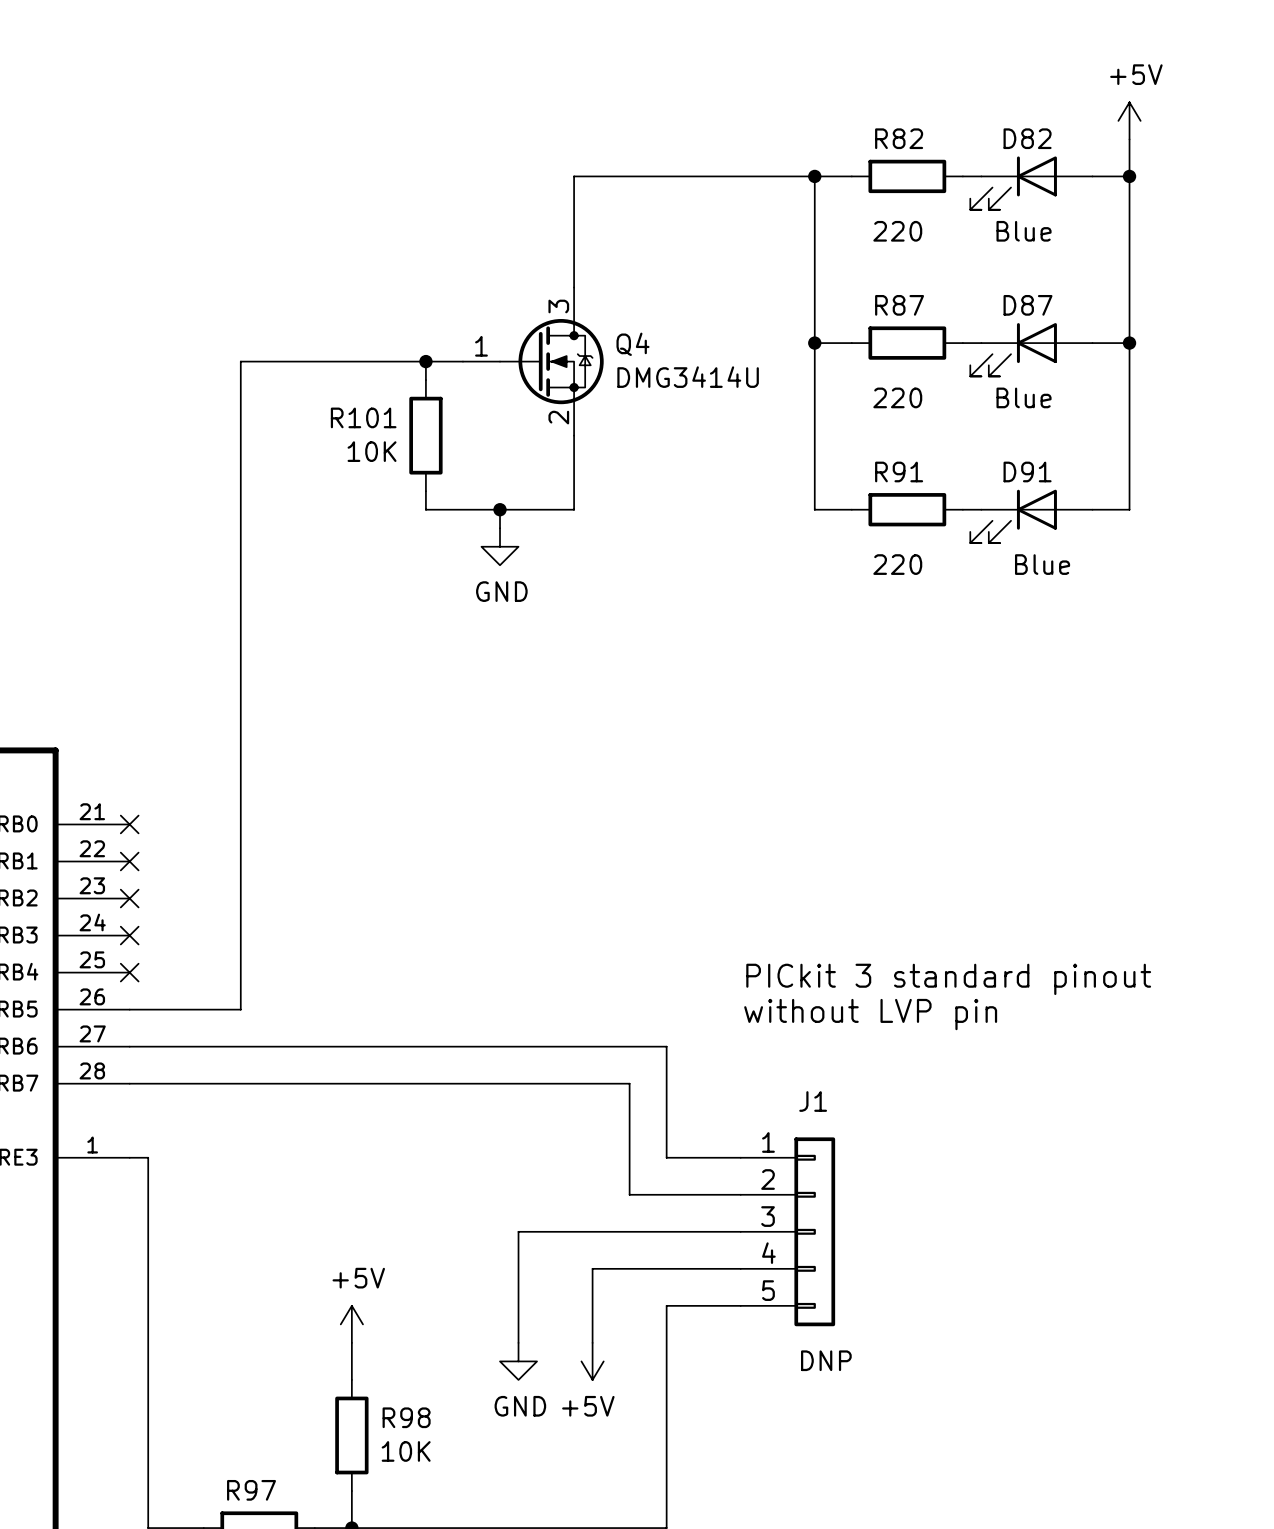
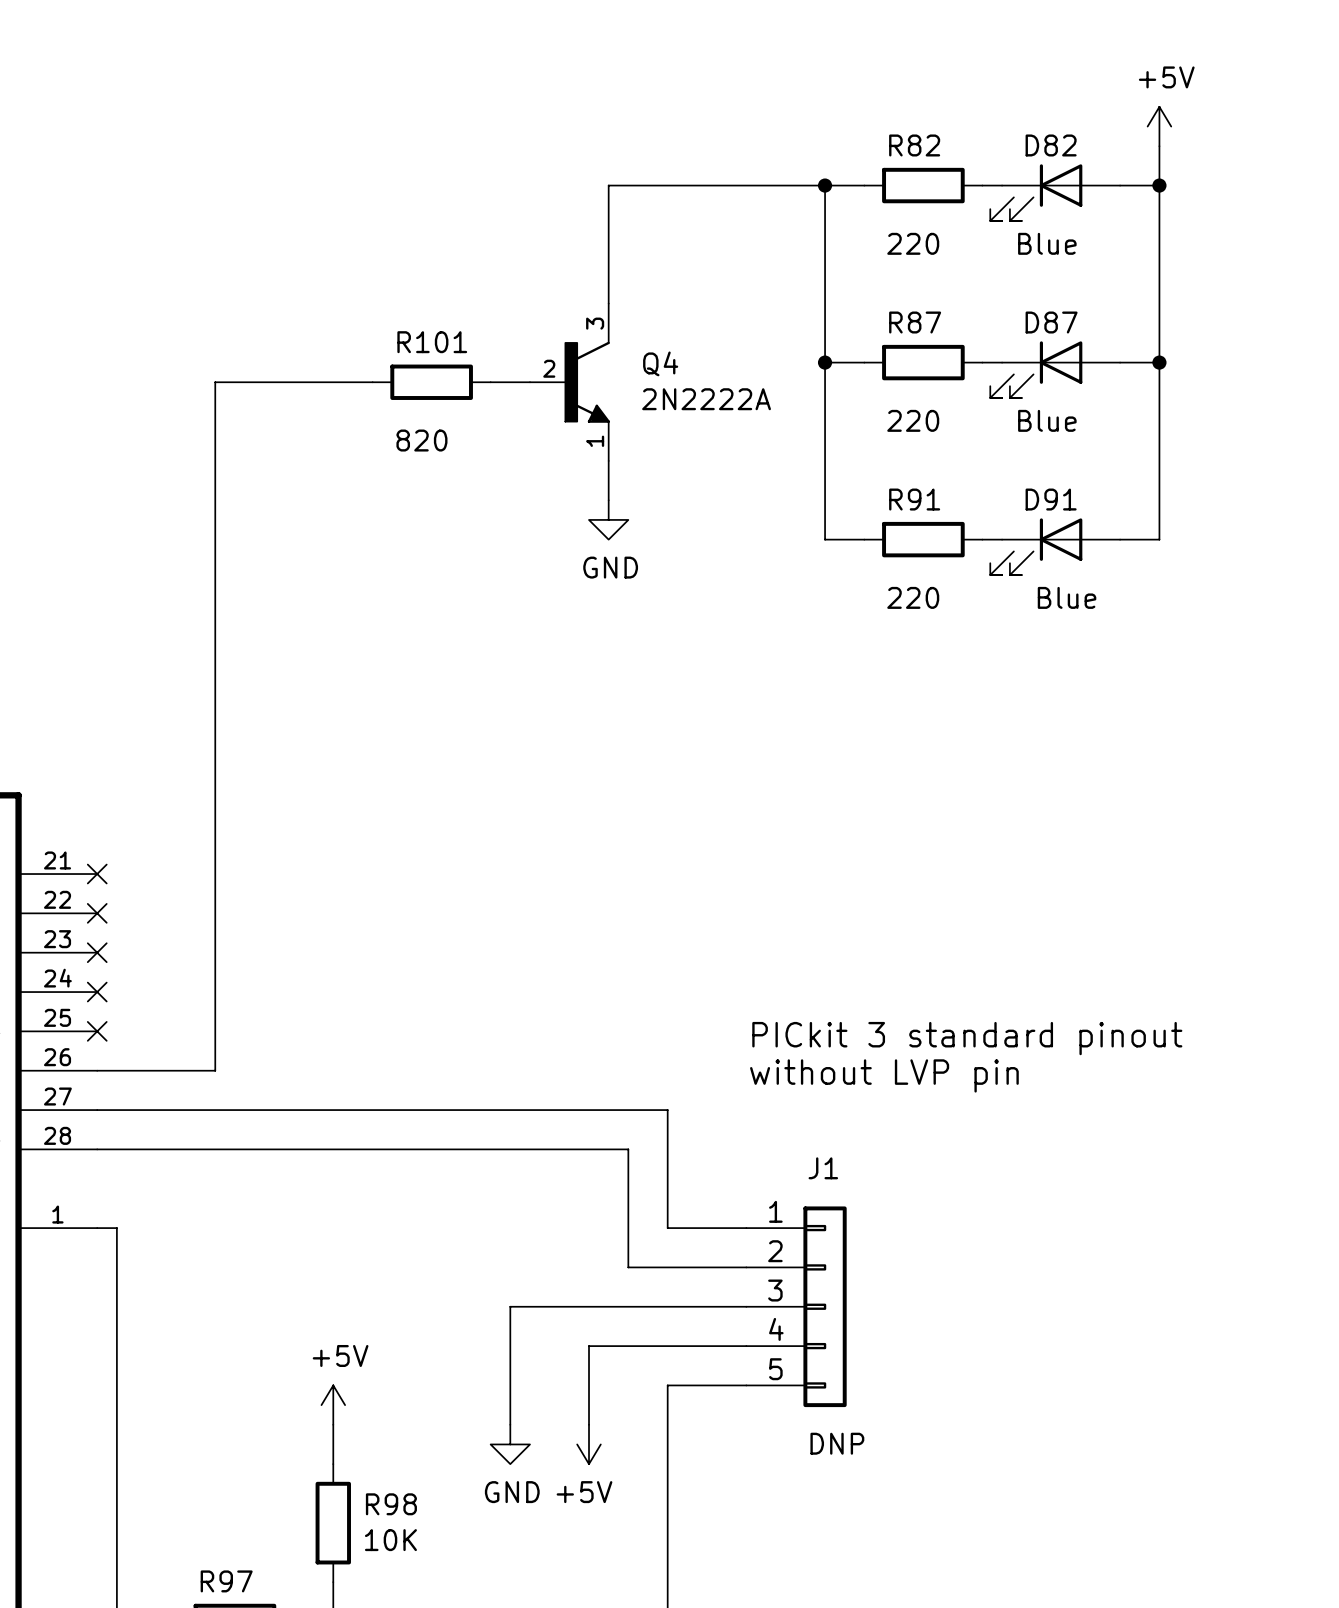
wire: (611, 176) (574, 176) (574, 287) -> (608, 185) (608, 303)
Q4 symbol: [462, 287, 604, 436] -> [529, 303, 610, 461]
wire: (388, 361) (462, 361) -> none
wire: (425, 361) (425, 380) -> none
junction: (425, 361) -> none
Q4 value: DMG3414U (688, 377) -> 2N2222A (706, 399)
R101 name position: R101 (363, 417) -> R101 (432, 342)
R101 rotation: 0° (425, 435) -> 90° clockwise (431, 382)
R101 position: (425, 435) -> (431, 382)
wire: (574, 435) (574, 509) (425, 509) (425, 491) -> none
wire: none -> (608, 460) (608, 500)
R101 value: 10K (372, 451) -> 820 (421, 440)
wire: (500, 509) (500, 528) -> none
junction: (500, 509) -> none
power symbol position: GND (500, 546) -> GND (608, 519)

